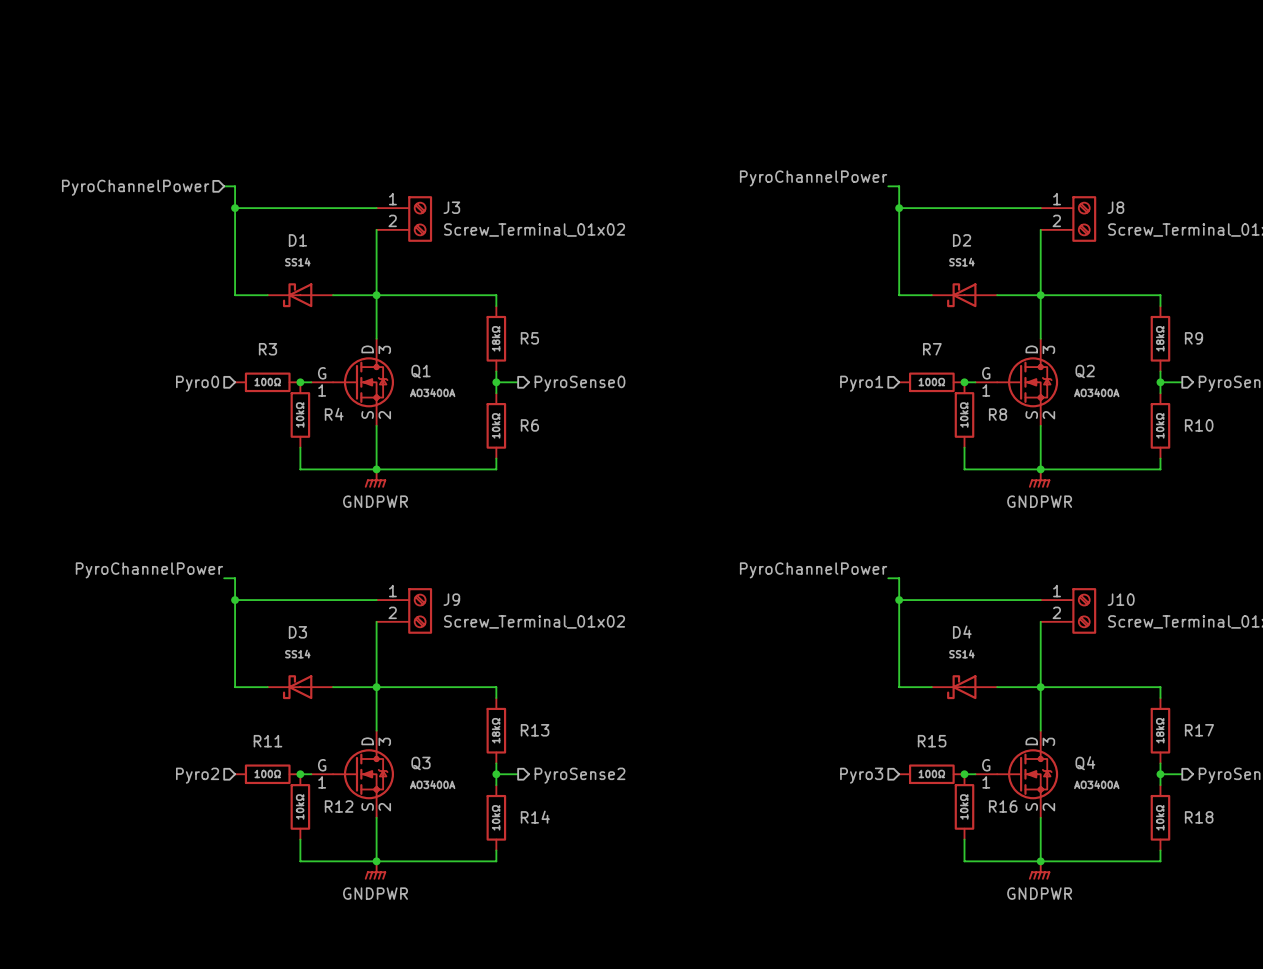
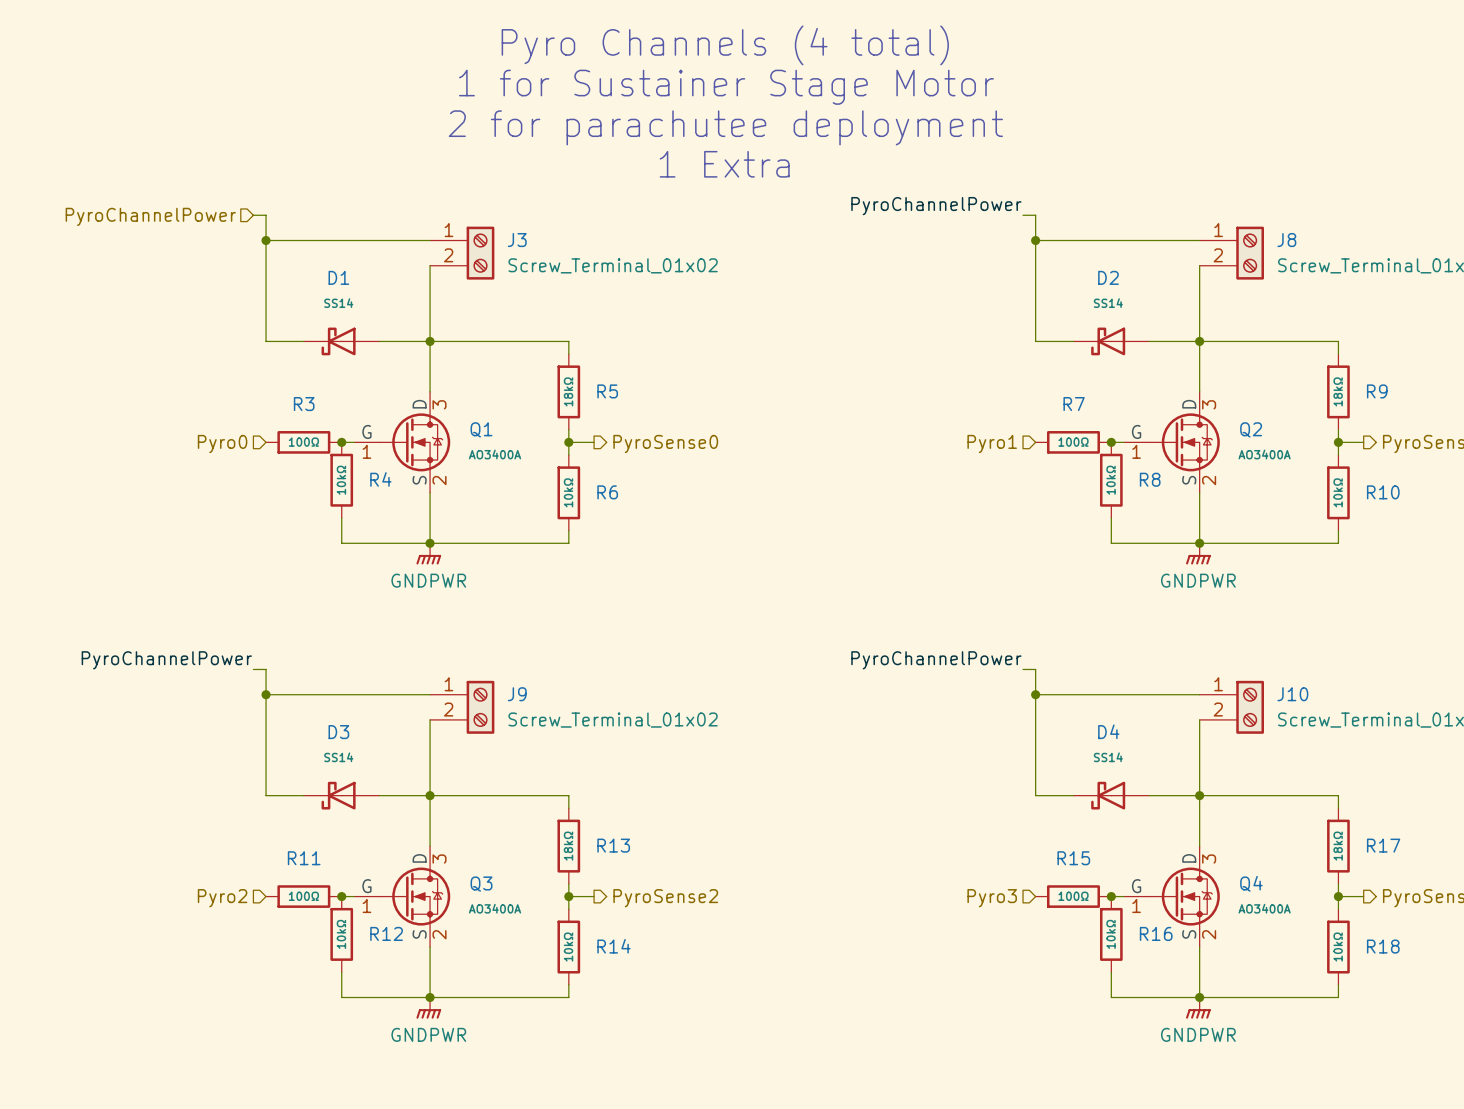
text: none -> Pyro Channels (4 total) (725, 45)
text: none -> 1 for Sustainer Stage Motor (726, 87)
text: none -> 2 for parachutee deployment (725, 127)
text: none -> 1 Extra (724, 164)

